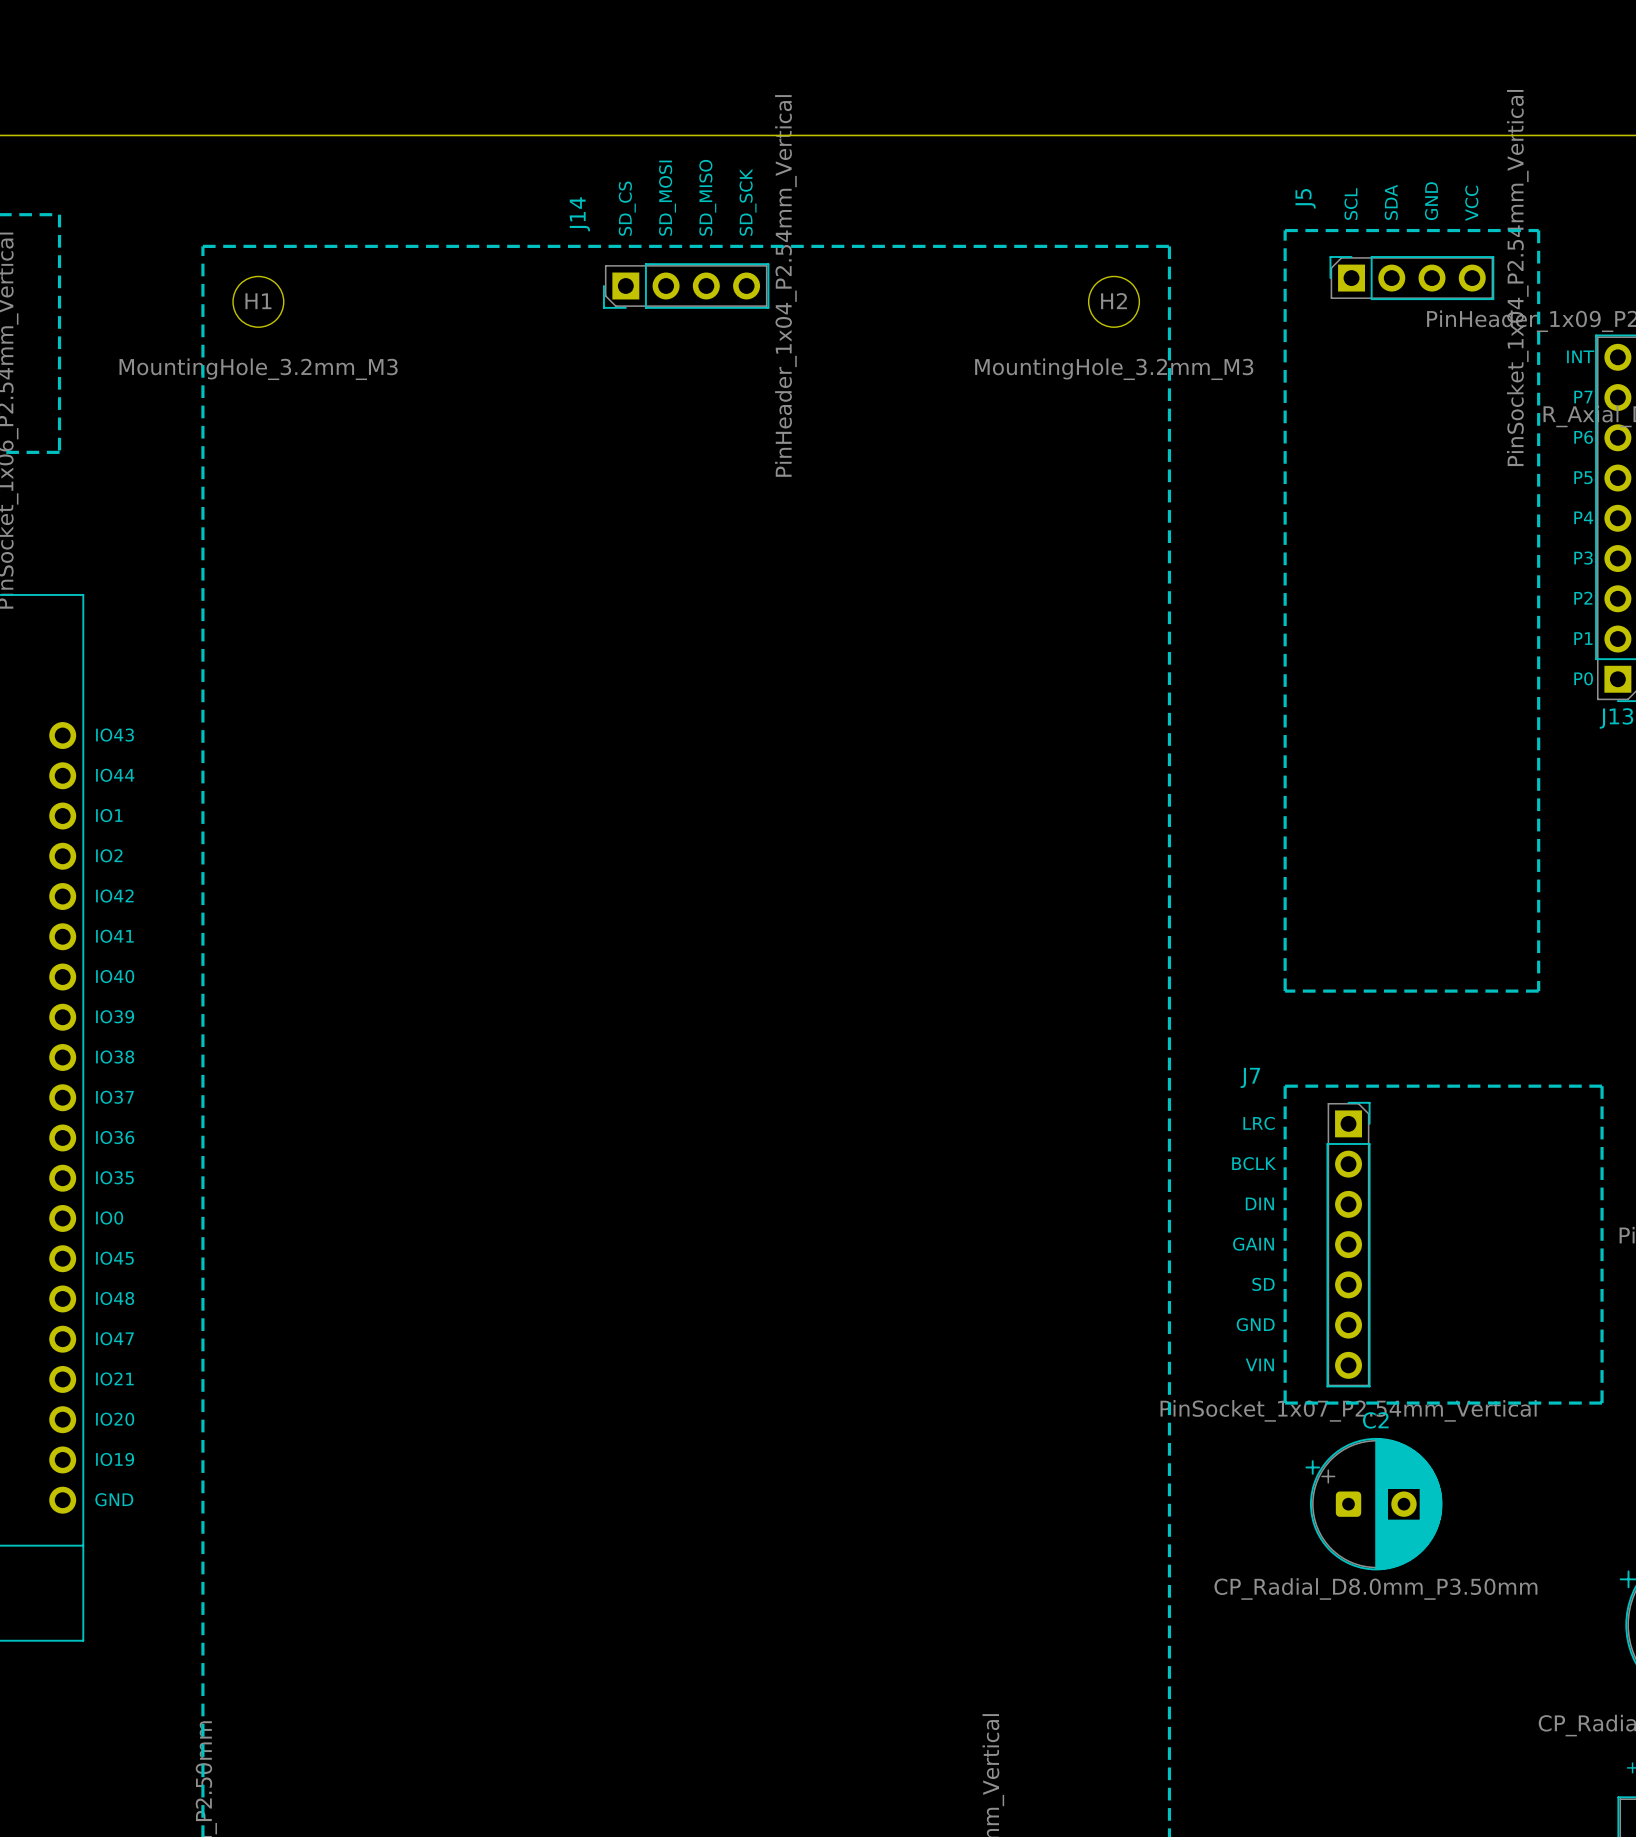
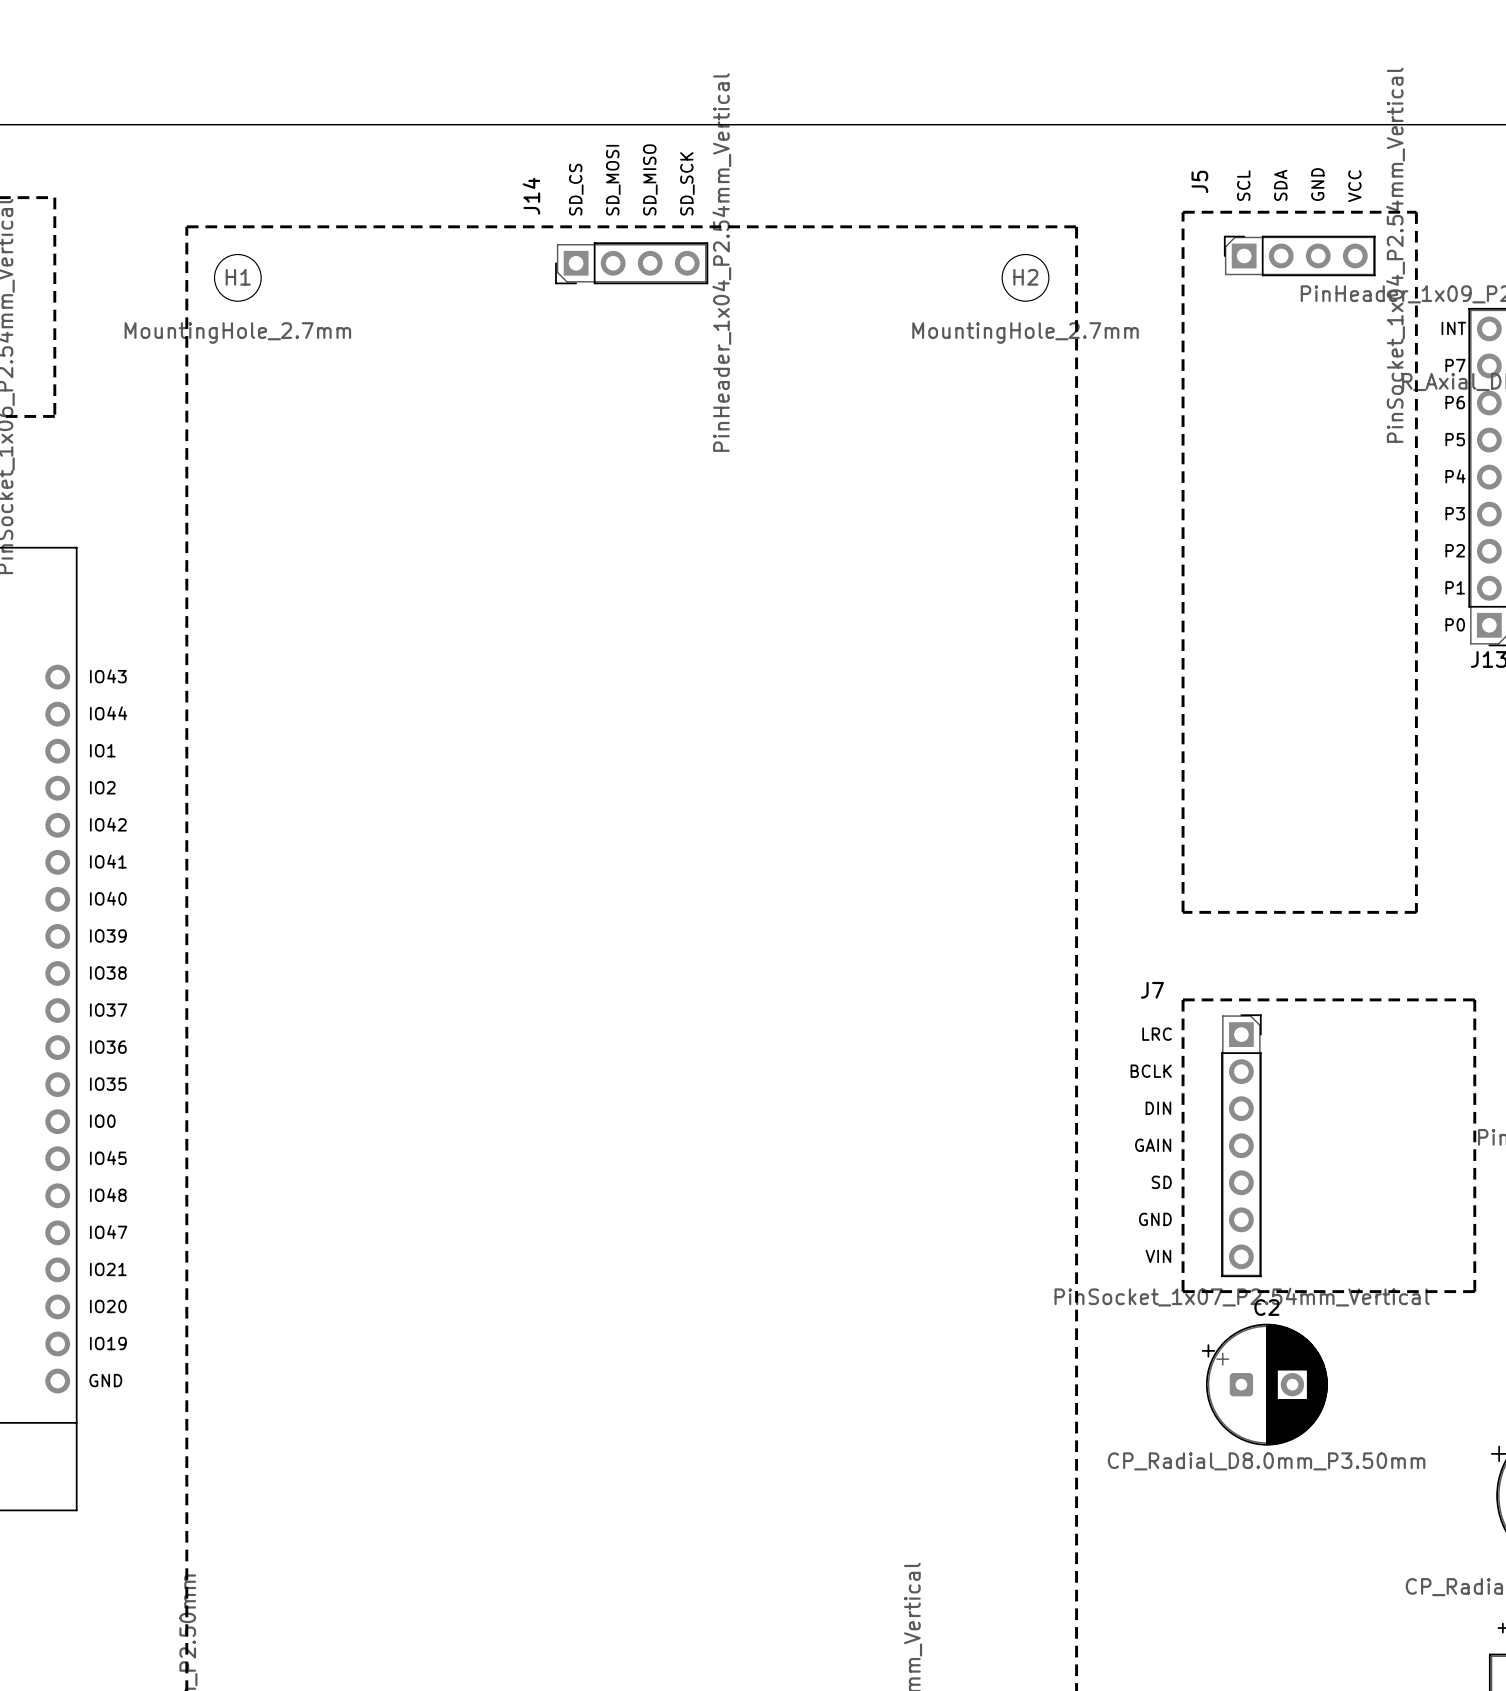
H1 value: MountingHole_3.2mm_M3 (258, 369) -> MountingHole_2.7mm (237, 332)
H2 value: MountingHole_3.2mm_M3 (1114, 369) -> MountingHole_2.7mm (1025, 332)

